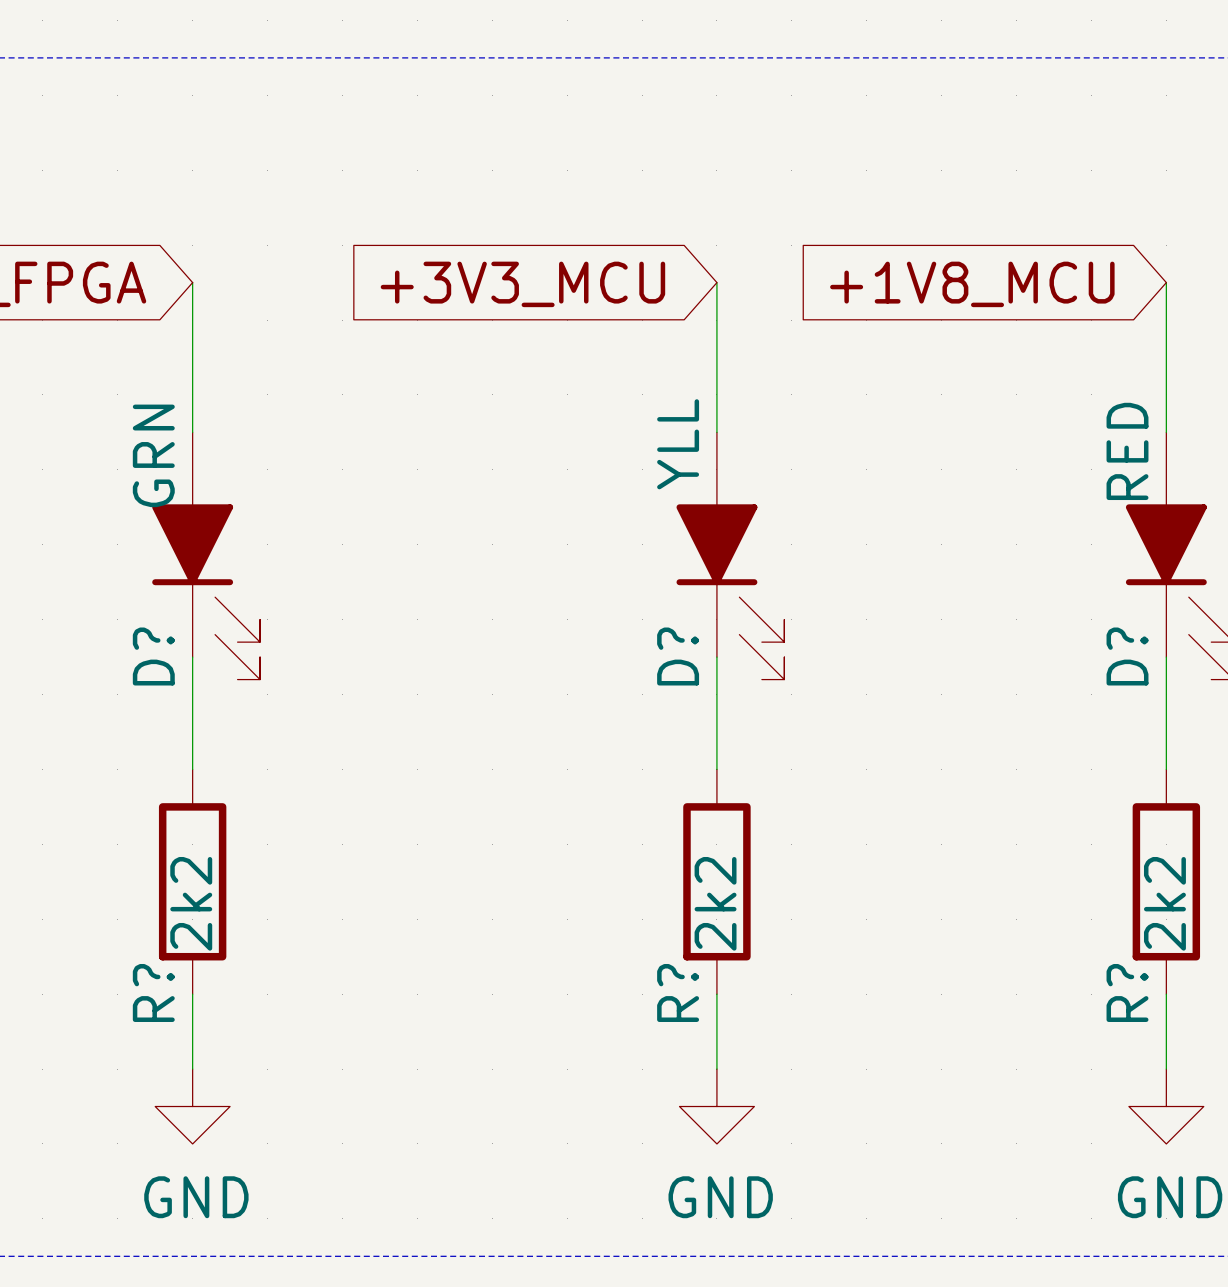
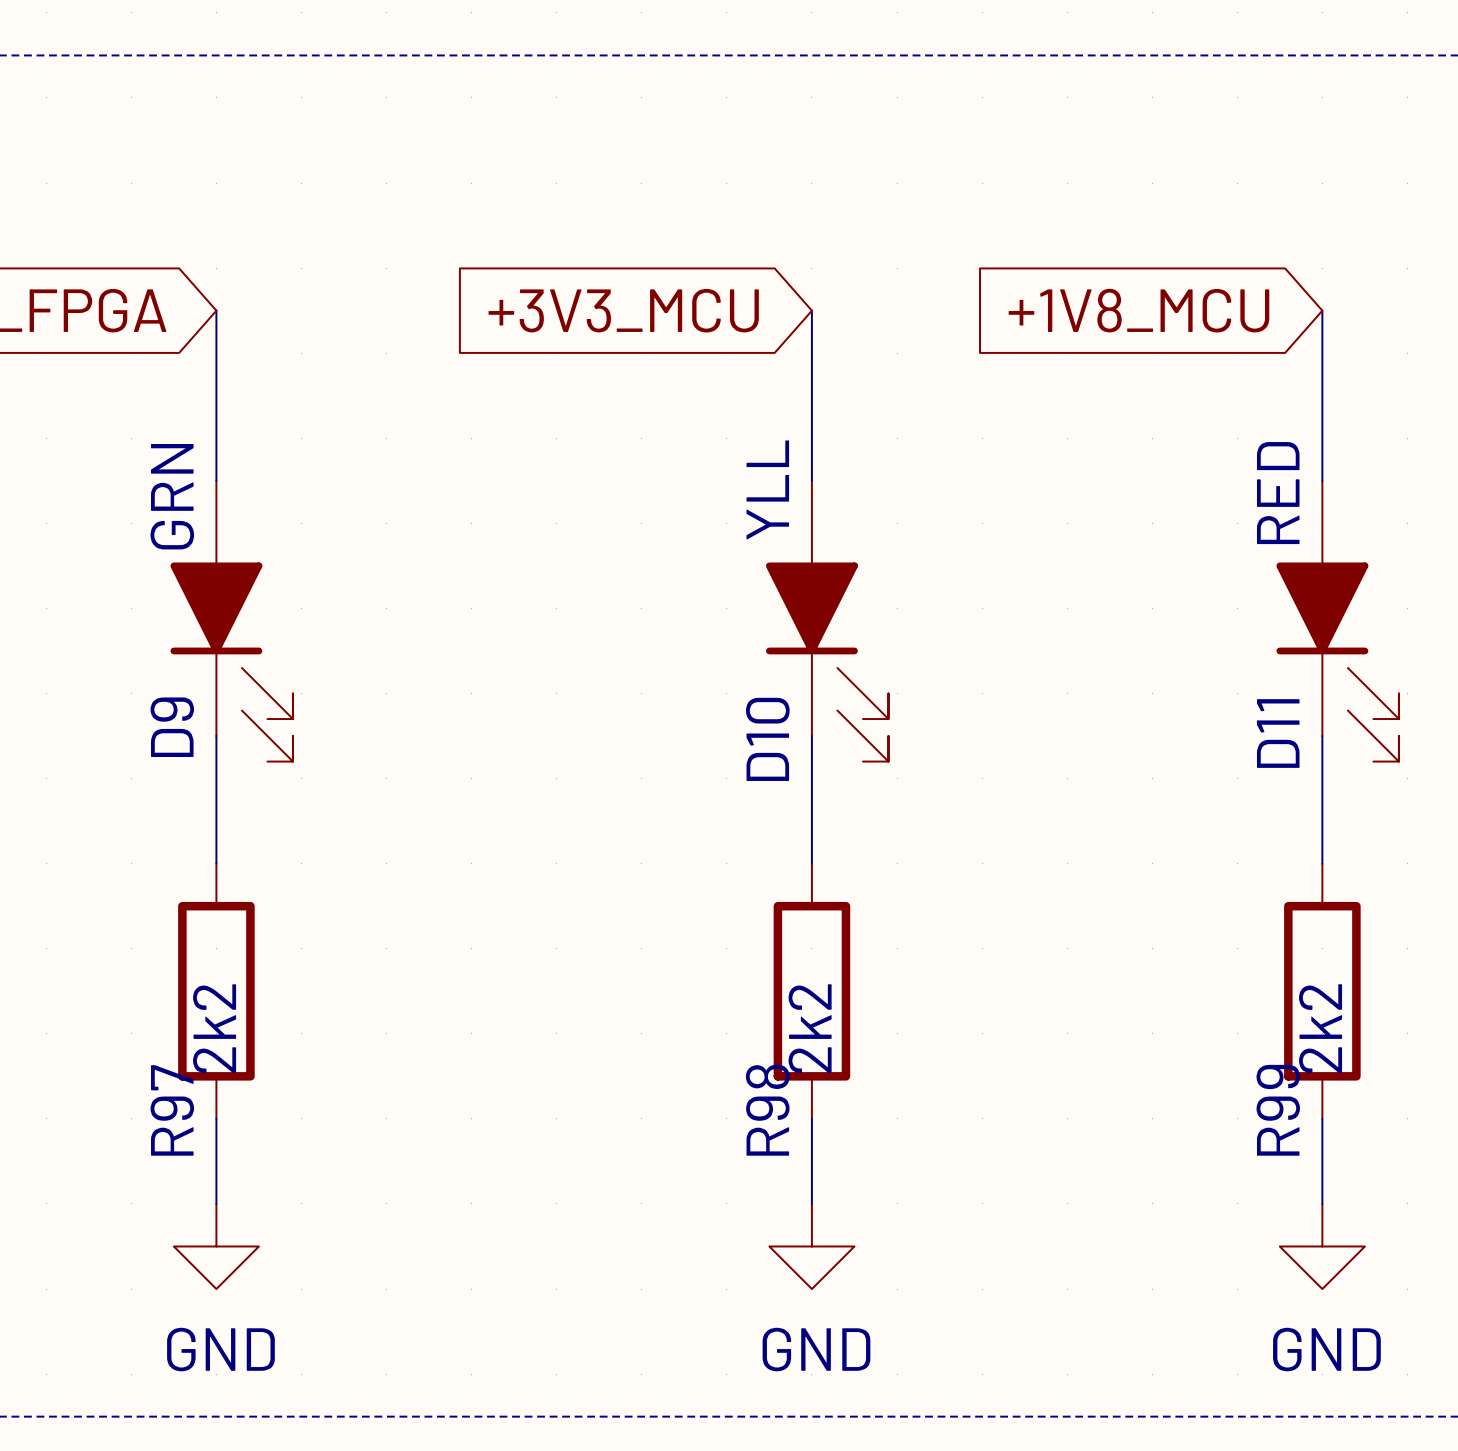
D? name: D? (153, 656) -> D9 (172, 727)
D? name: D? (678, 656) -> D10 (767, 739)
D? name: D? (1127, 656) -> D11 (1278, 733)
R? name: R? (153, 992) -> R97 (172, 1110)
R? name: R? (678, 992) -> R98 (767, 1110)
R? name: R? (1127, 992) -> R99 (1278, 1110)

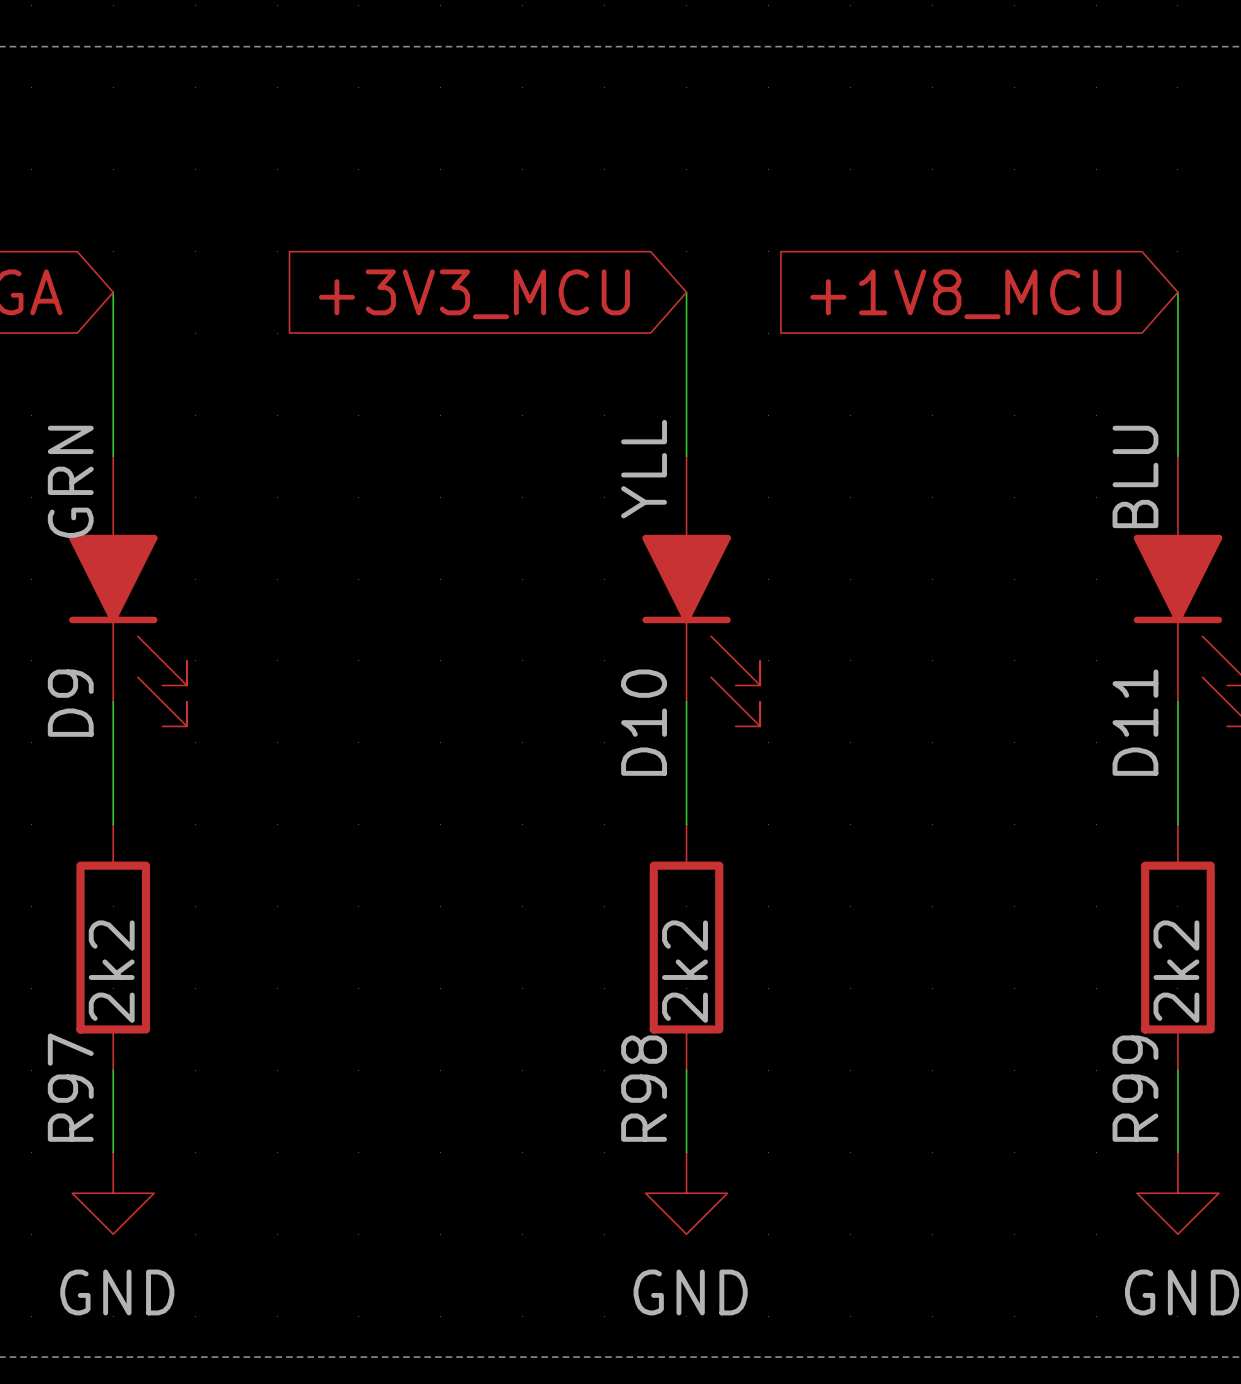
D11 value: RED (1278, 493) -> BLU (1135, 476)
R97 name position: R97 (172, 1110) -> R97 (70, 1087)
R98 name position: R98 (767, 1110) -> R98 (644, 1088)
R99 name position: R99 (1278, 1110) -> R99 (1135, 1088)

